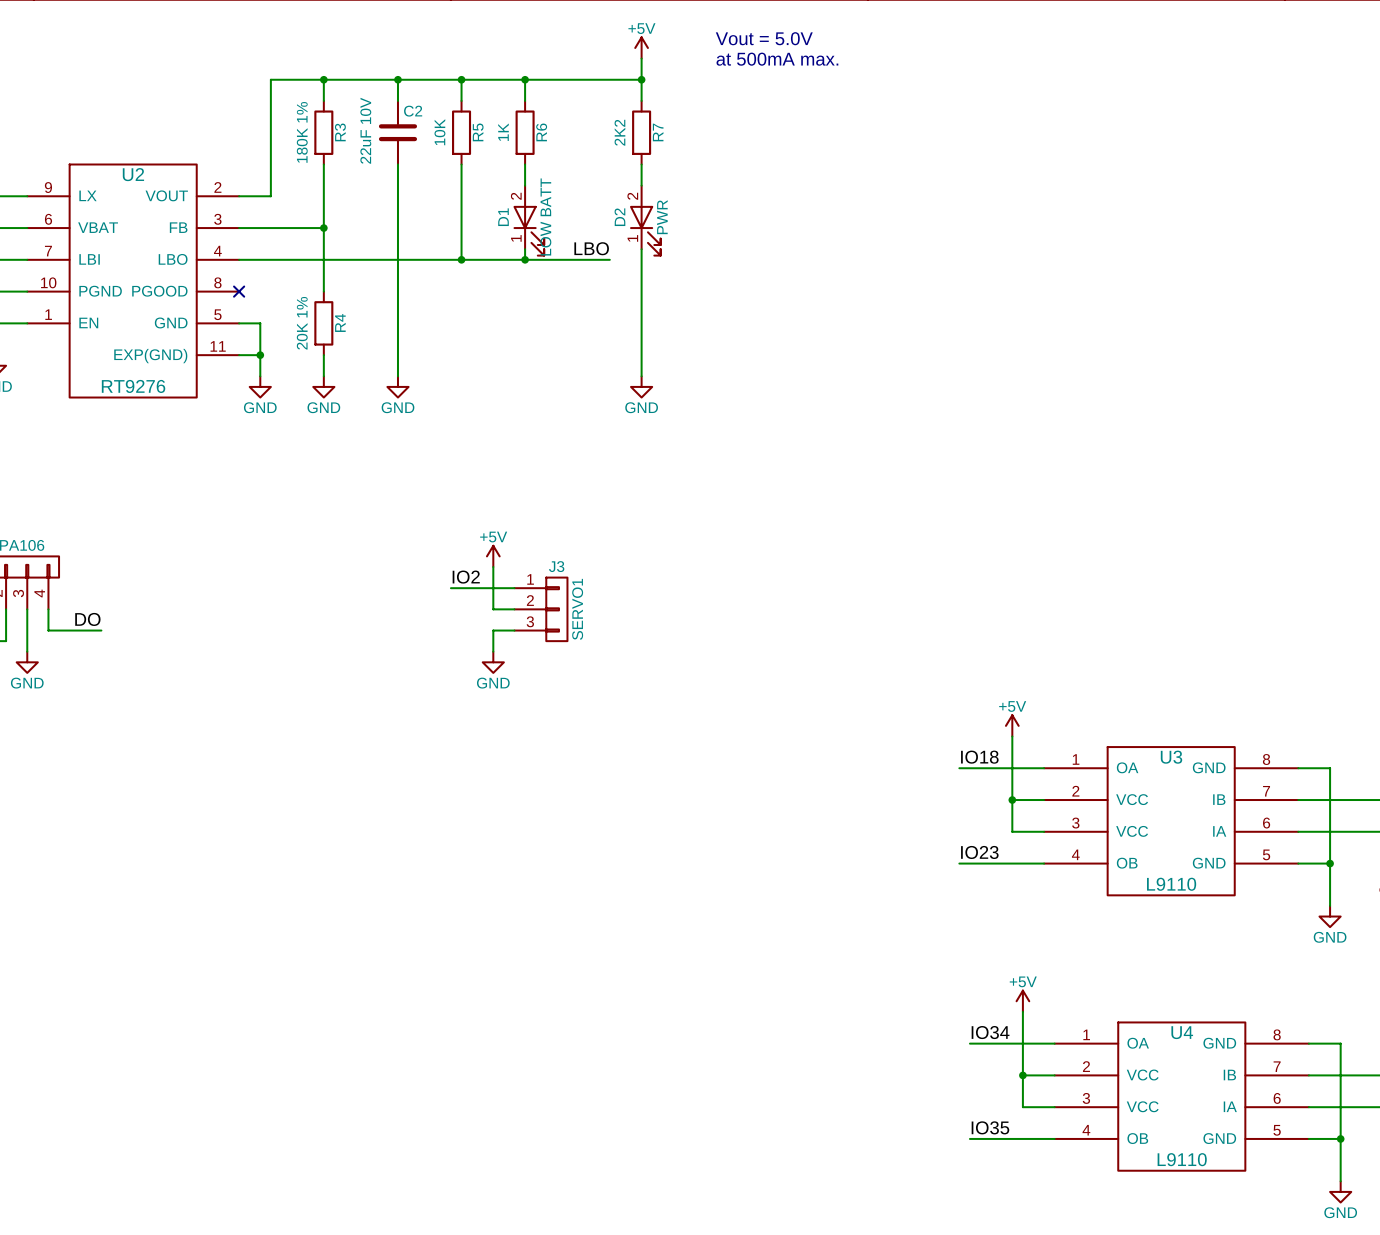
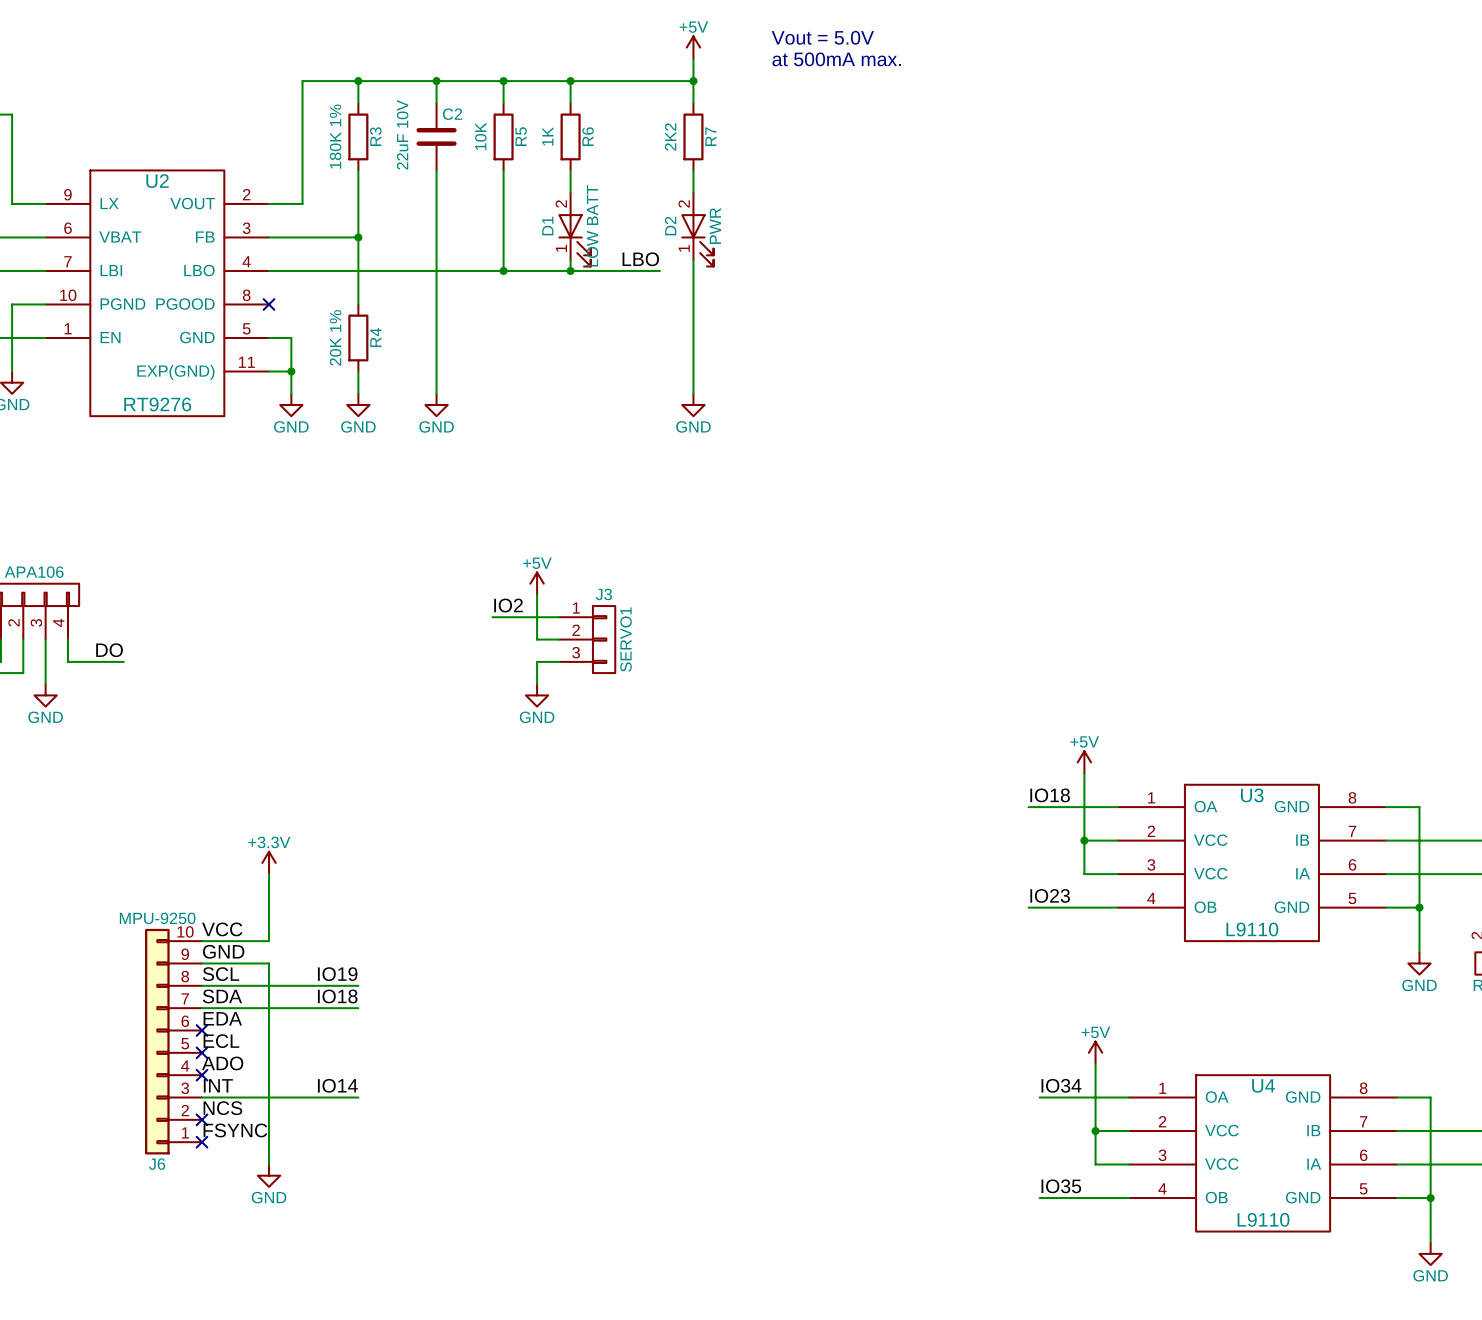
power symbol: none -> +3.3V (269, 862)
wire: none -> (269, 874) (269, 941) (202, 941)
label: none -> VCC (222, 929)
label: none -> GND (223, 951)
wire: none -> (202, 963) (269, 963) (269, 1164)
label: none -> SCL (221, 974)
label: none -> IO19 (337, 974)
wire: none -> (202, 985) (358, 985)
label: none -> SDA (222, 996)
label: none -> IO18 (337, 996)
wire: none -> (202, 1008) (358, 1008)
label: none -> EDA (222, 1018)
no-connect mark: none -> (202, 1030)
J6: none -> MPU-9250 (173, 1041)
label: none -> ECL (221, 1041)
no-connect mark: none -> (202, 1052)
label: none -> ADO (222, 1063)
no-connect mark: none -> (202, 1075)
label: none -> INT (218, 1085)
label: none -> IO14 (337, 1085)
wire: none -> (202, 1097) (358, 1097)
label: none -> NCS (222, 1108)
no-connect mark: none -> (202, 1119)
label: none -> FSYNC (235, 1130)
no-connect mark: none -> (202, 1142)
power symbol: none -> GND (269, 1175)

